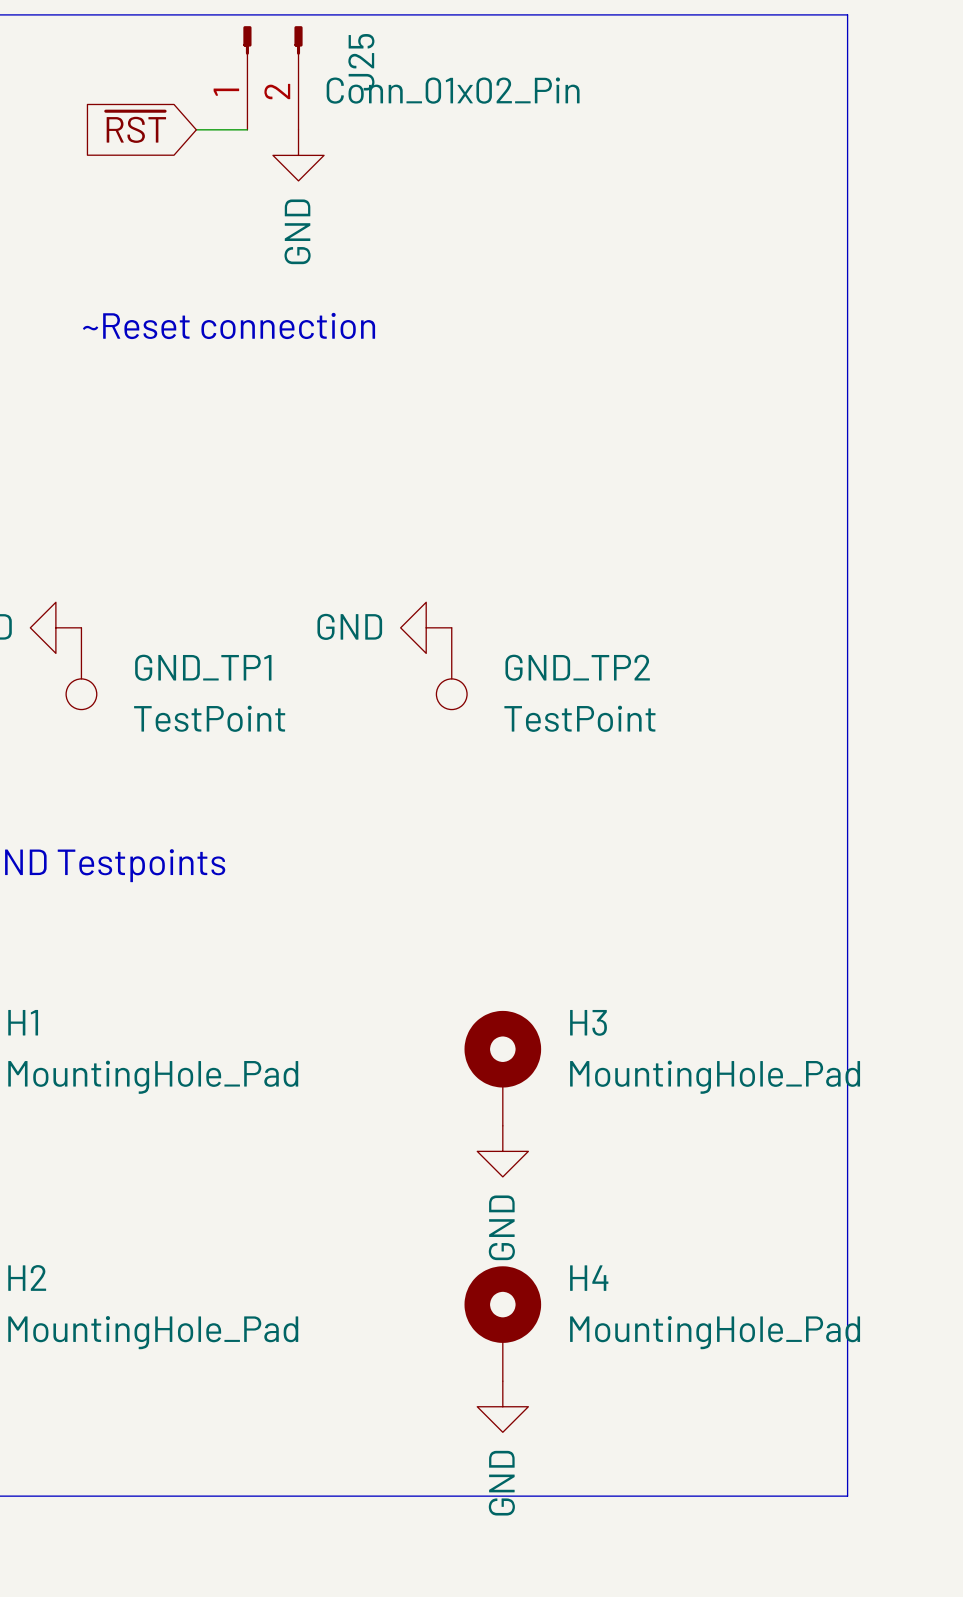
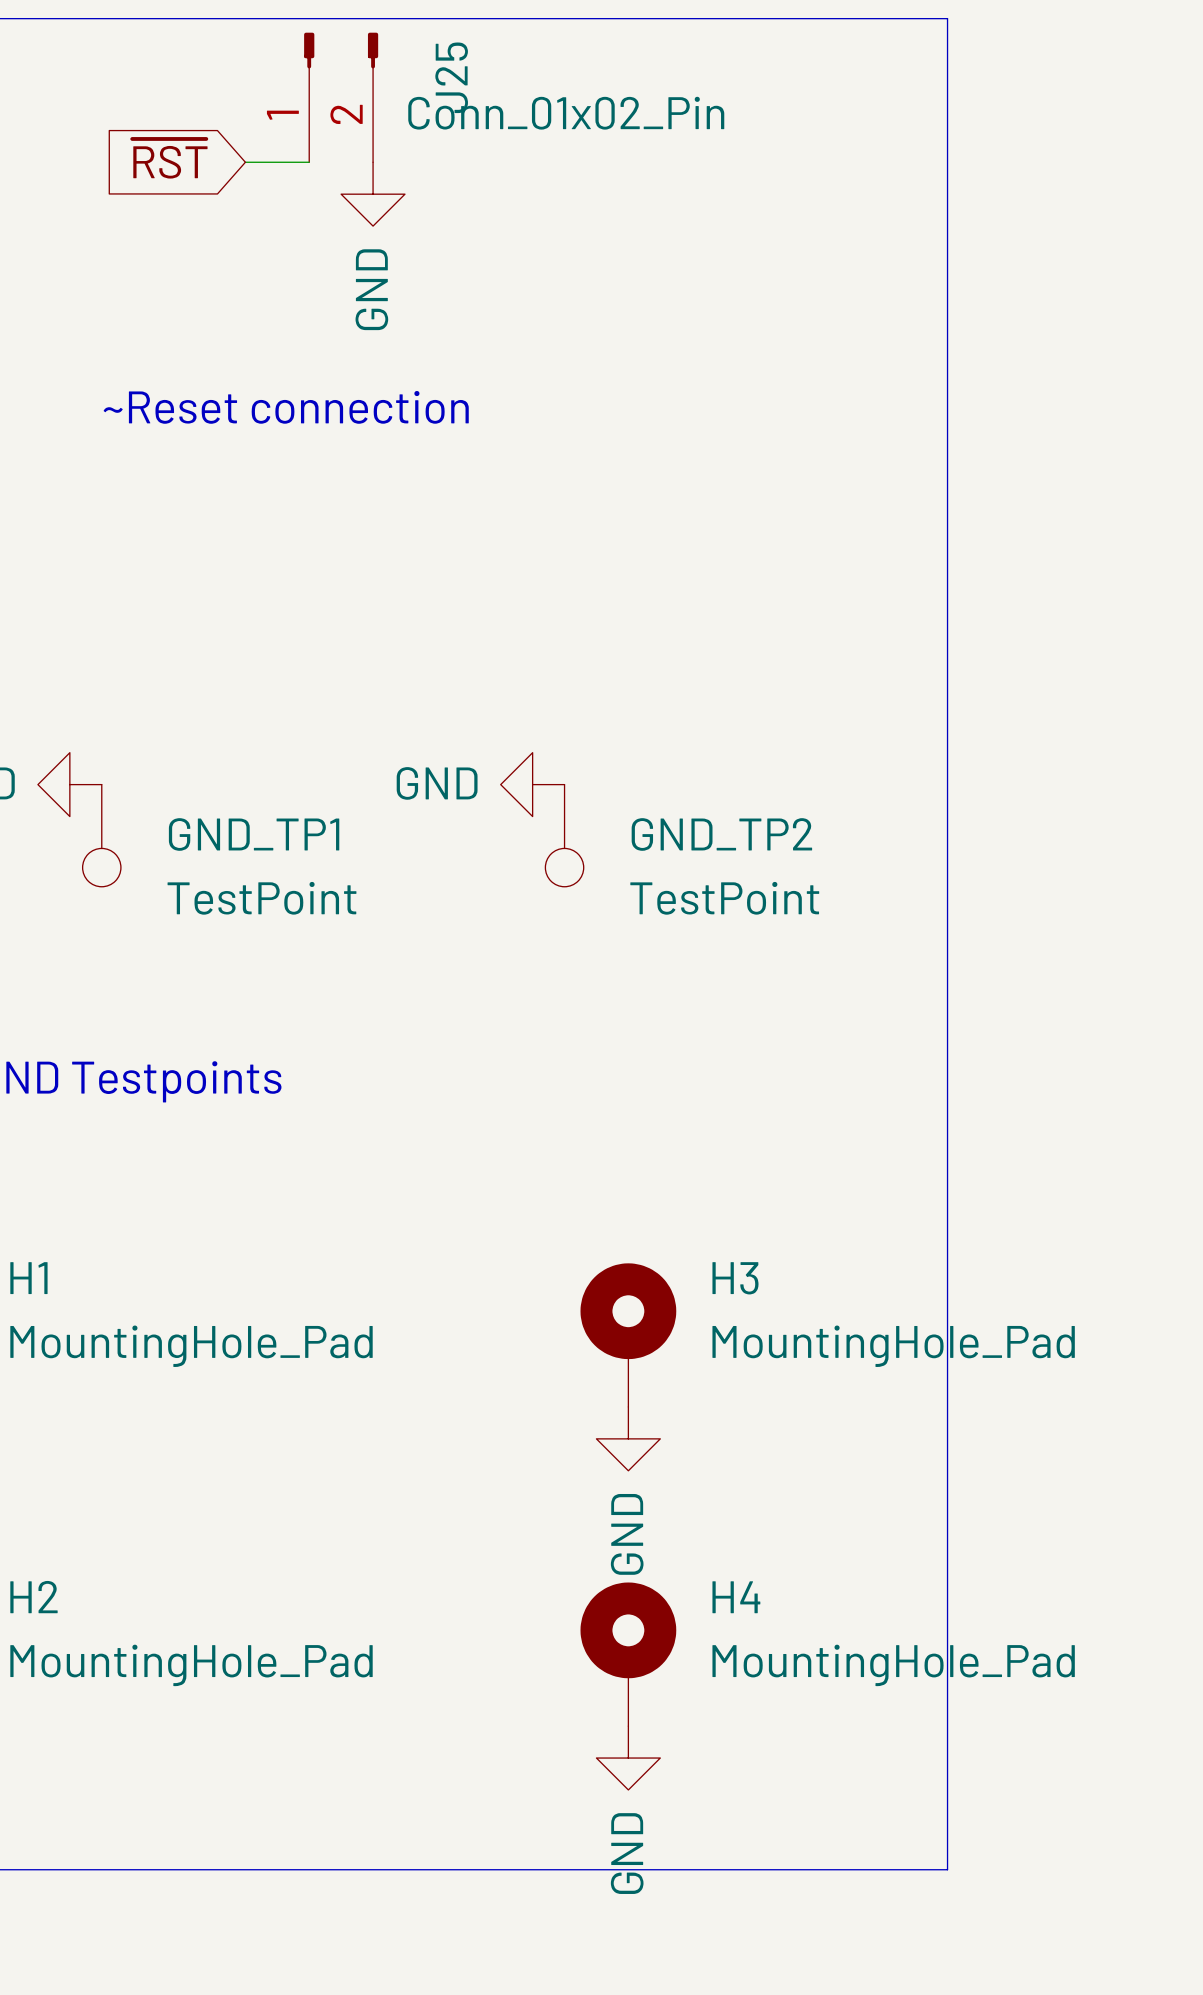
line: (758, 14) (847, 14) (847, 1496) (758, 1496) -> (947, 18) (947, 1869)

